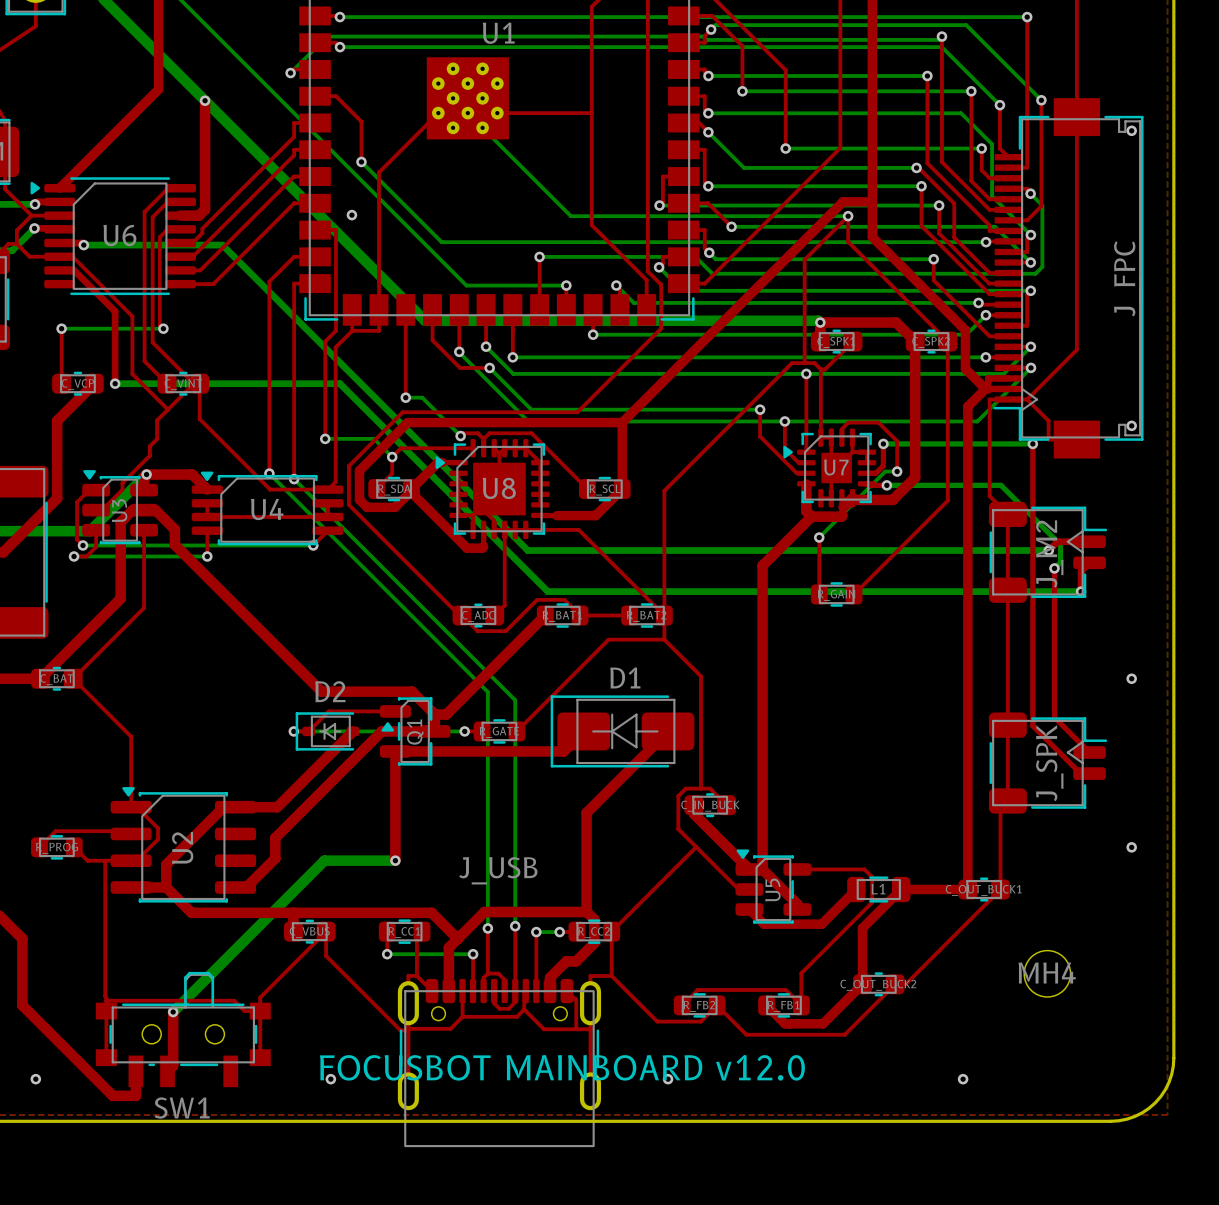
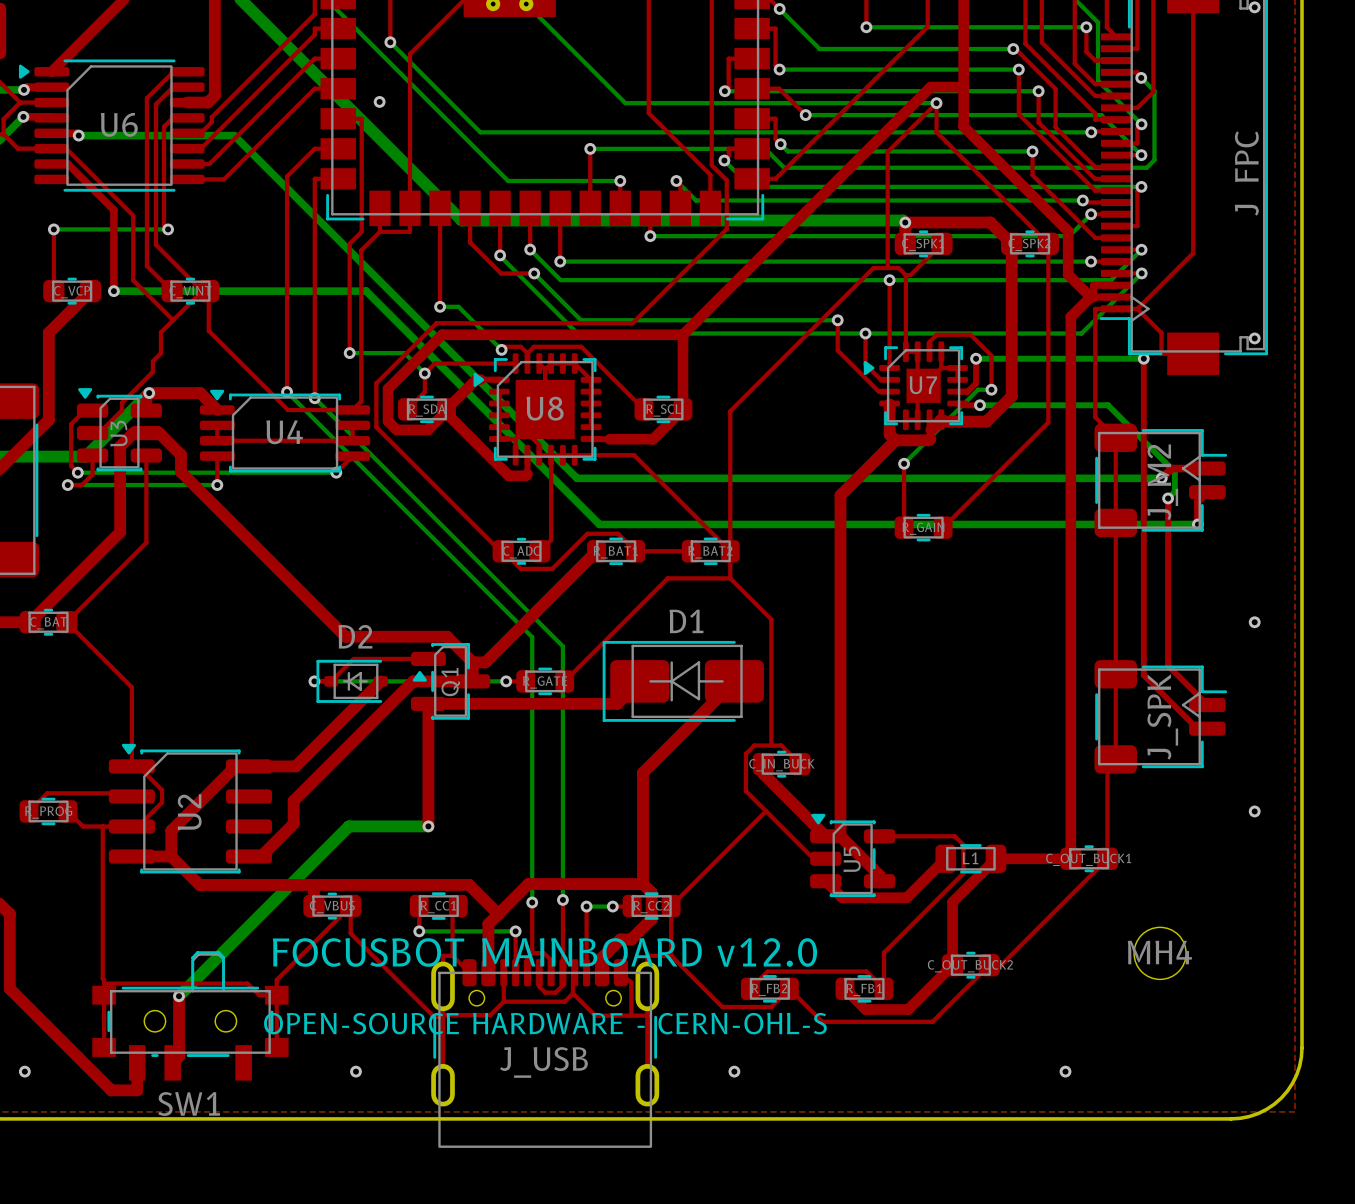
J_USB name position: J_USB (498, 870) -> J_USB (543, 1062)
text: none -> OPEN-SOURCE HARDWARE - CERN-OHL-S (545, 1023)
text position: FOCUSBOT MAINBOARD v12.0 (562, 1067) -> FOCUSBOT MAINBOARD v12.0 (544, 952)

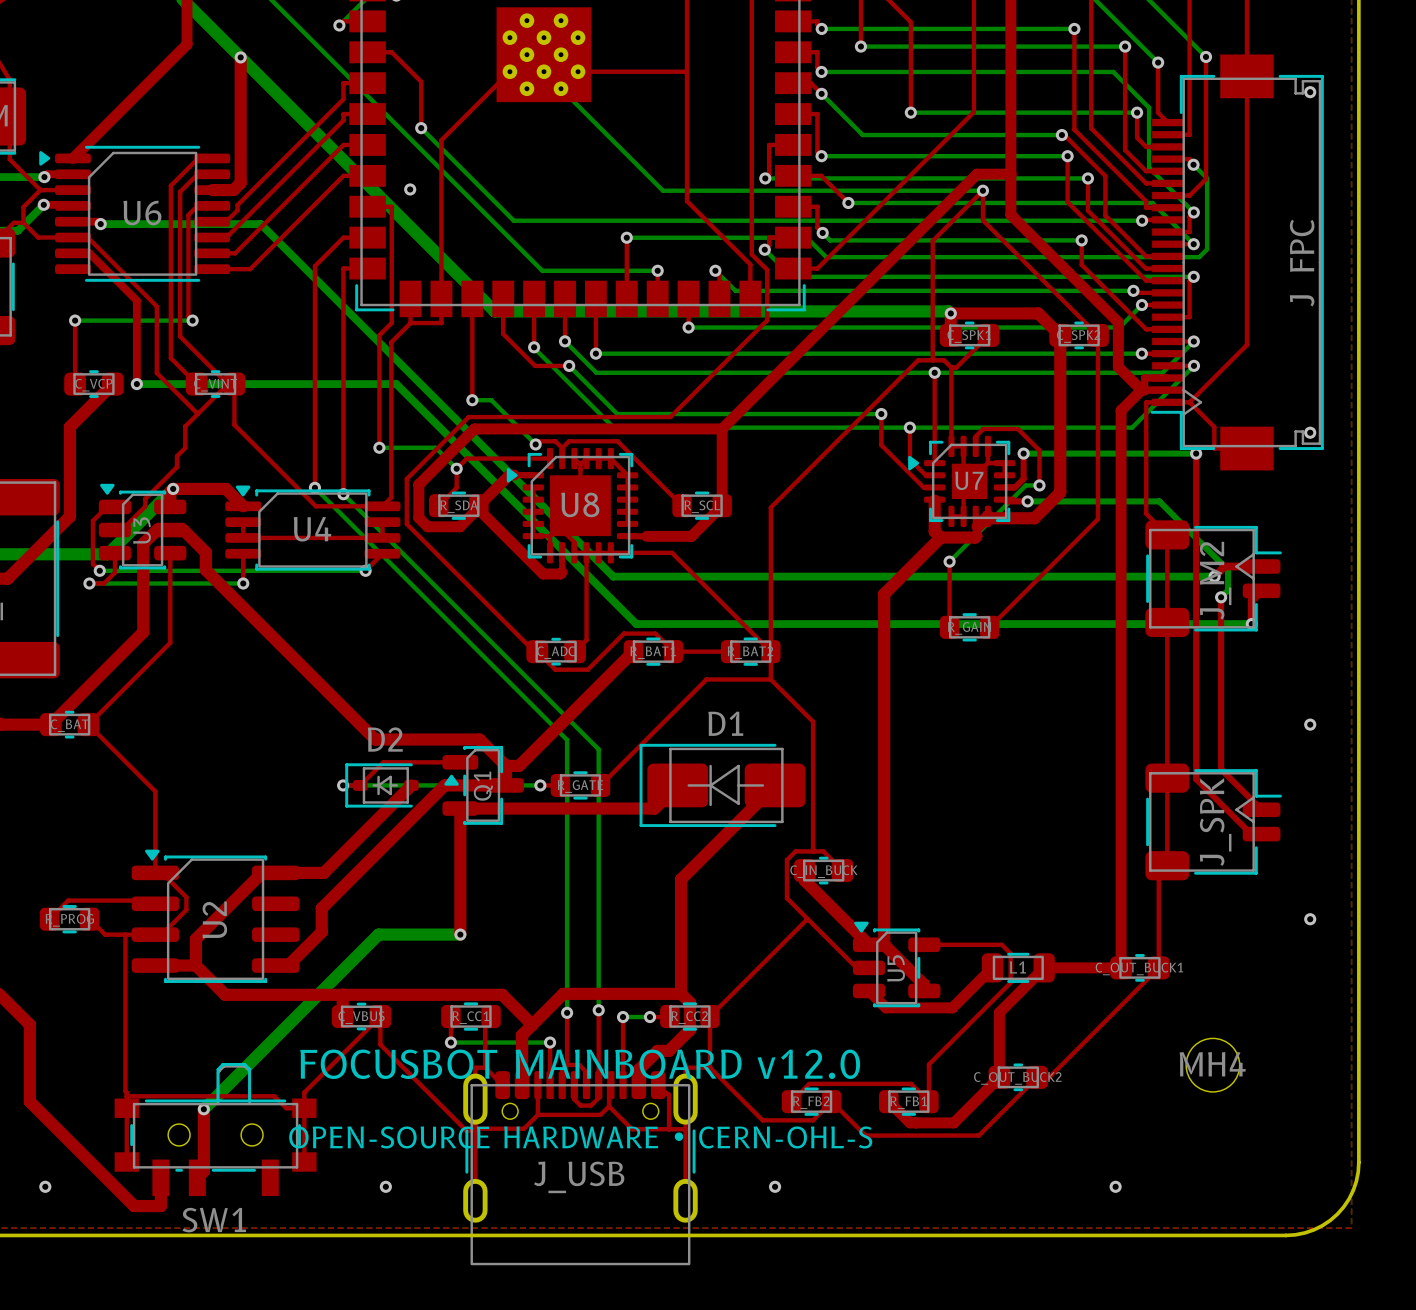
text: OPEN-SOURCE HARDWARE - CERN-OHL-S (545, 1023) -> OPEN-SOURCE HARDWARE • CERN-OHL-S (580, 1137)

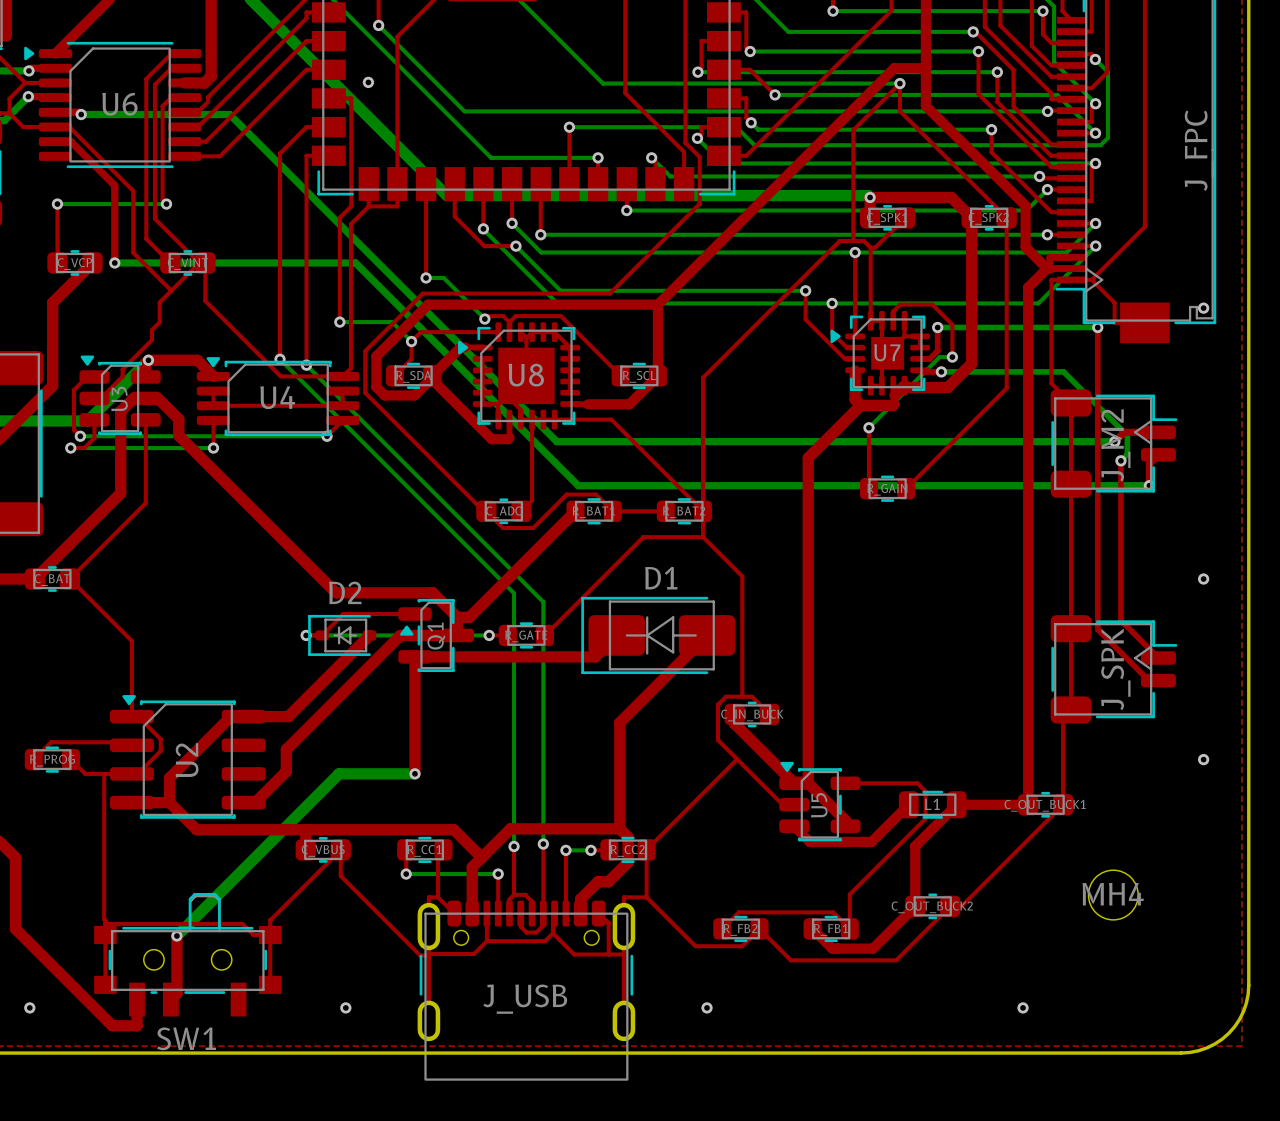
text: FOCUSBOT MAINBOARD v12.0 (580, 1064) -> none
text: OPEN-SOURCE HARDWARE • CERN-OHL-S (580, 1137) -> none

